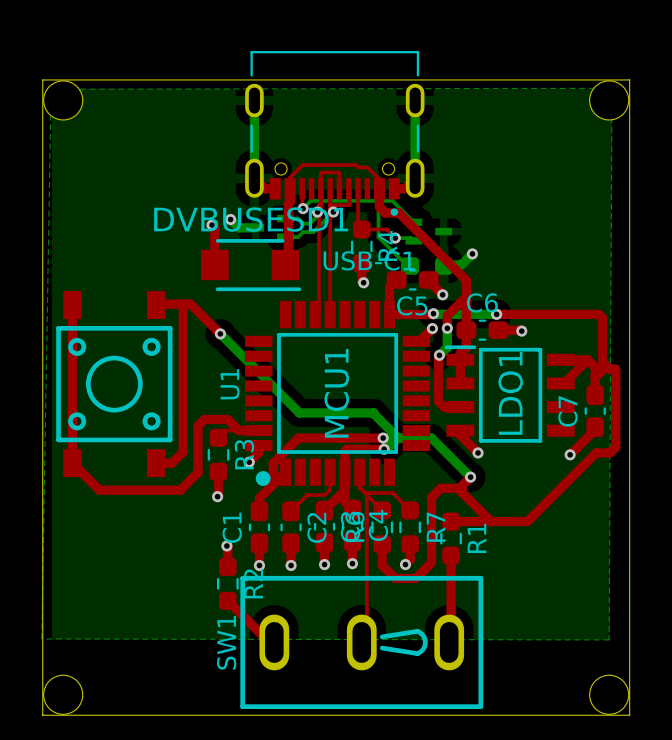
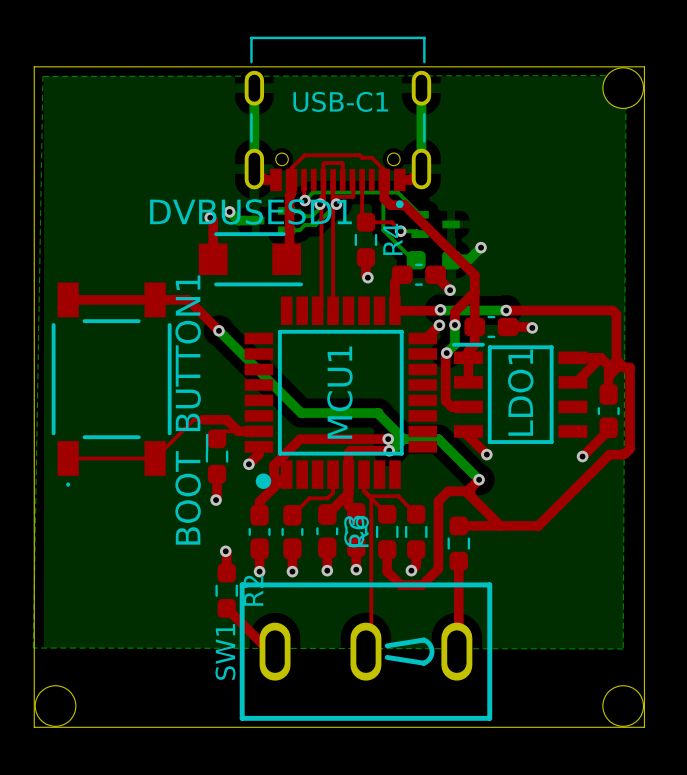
part: (63, 100) -> none
USB-C1 name position: USB-C1 (369, 260) -> USB-C1 (340, 101)
C6 name: C6 (482, 302) -> none
top track: none -> (68, 299) (155, 299)
top track: (183, 304) (183, 452) (172, 463) (156, 463) -> none
top track: (72, 305) (72, 463) (99, 490) (180, 490) (198, 472) (198, 425) (204, 419) -> (68, 458) (155, 458) (193, 419) (202, 419)
C5 name: C5 (412, 305) -> none
U1: (114, 384) -> none
BOOT_BUTTON1: none -> (111, 384)
C7 name: C7 (567, 411) -> none
R3 name: R3 (244, 454) -> none
C4 name: C4 (378, 525) -> none
C1 name: C1 (232, 527) -> none
C2 name: C2 (317, 527) -> none
R7 name: R7 (436, 527) -> none
R1 name: R1 (476, 538) -> none

